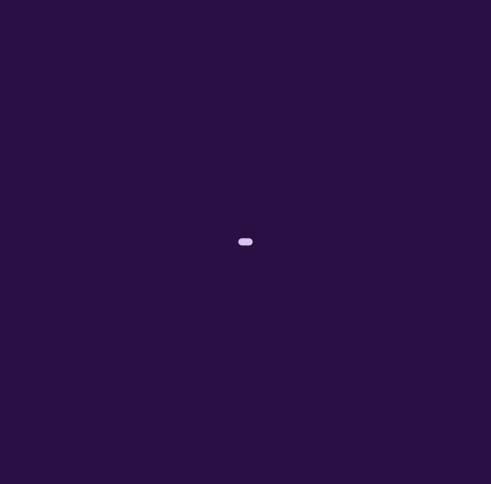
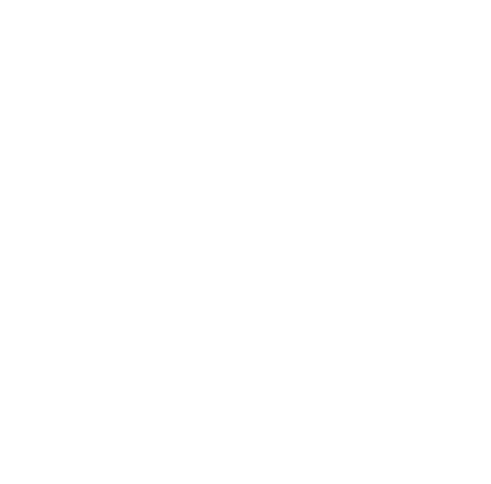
board edge: (249, 241) (241, 241) -> none

